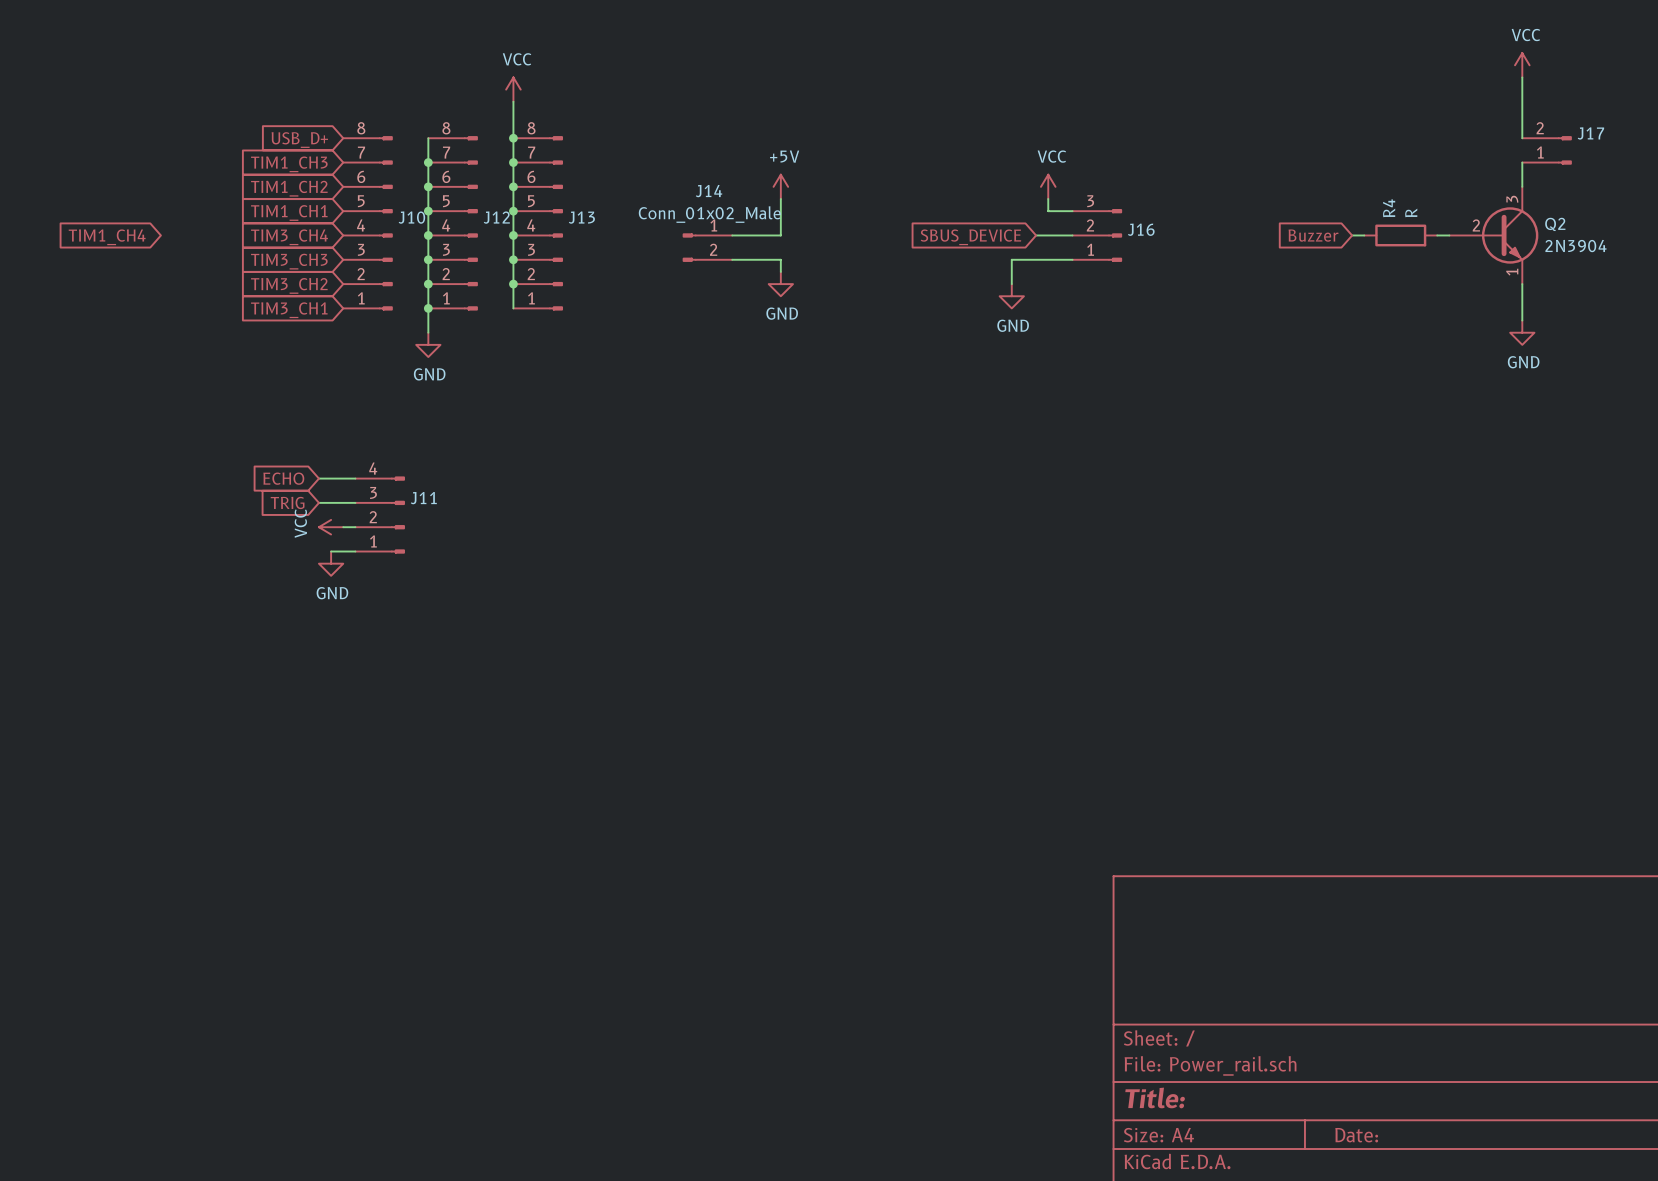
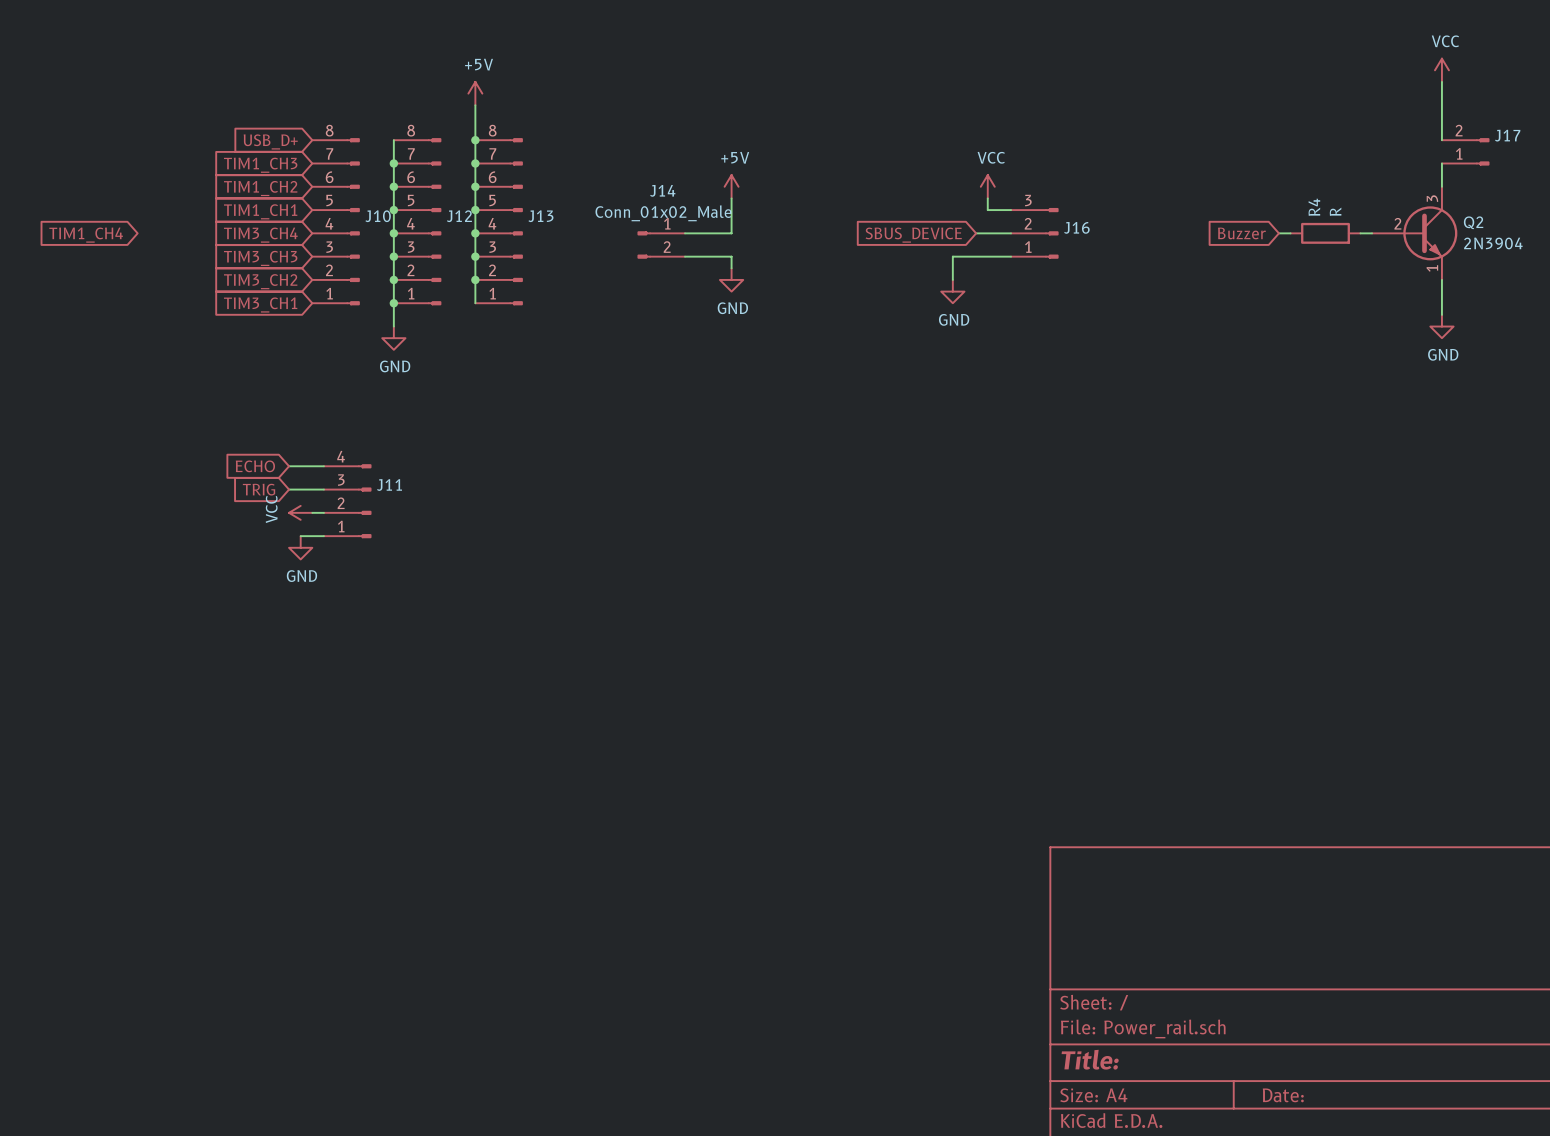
power symbol: VCC (513, 89) -> +5V (475, 93)

